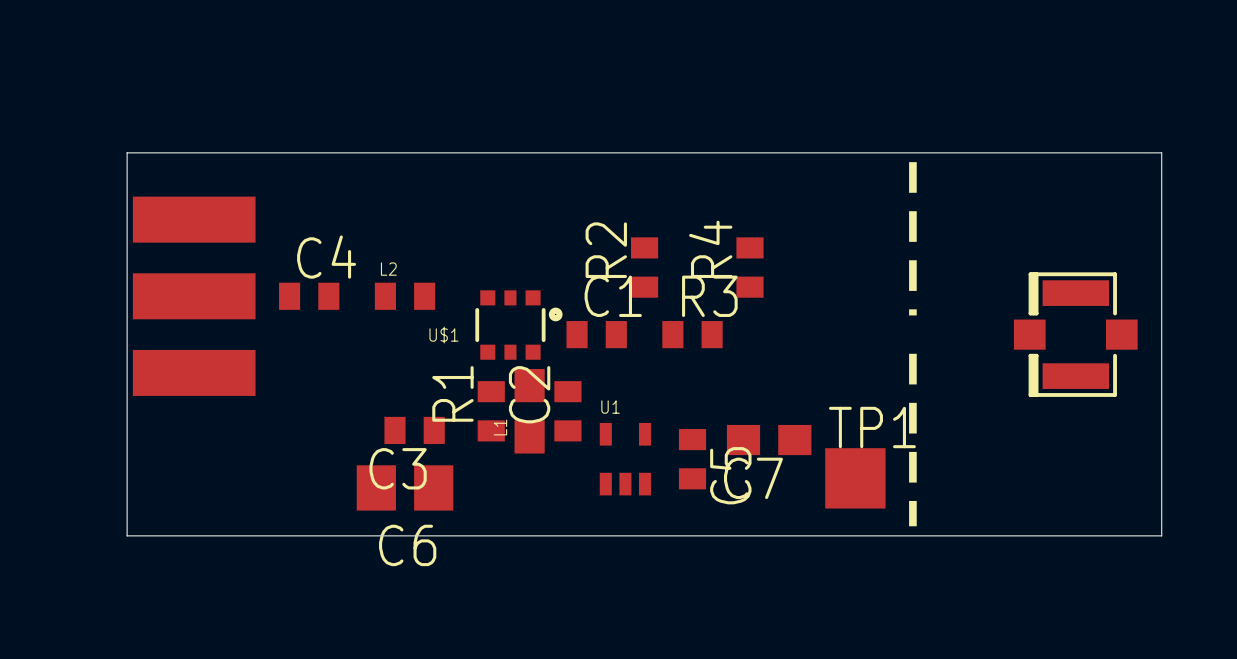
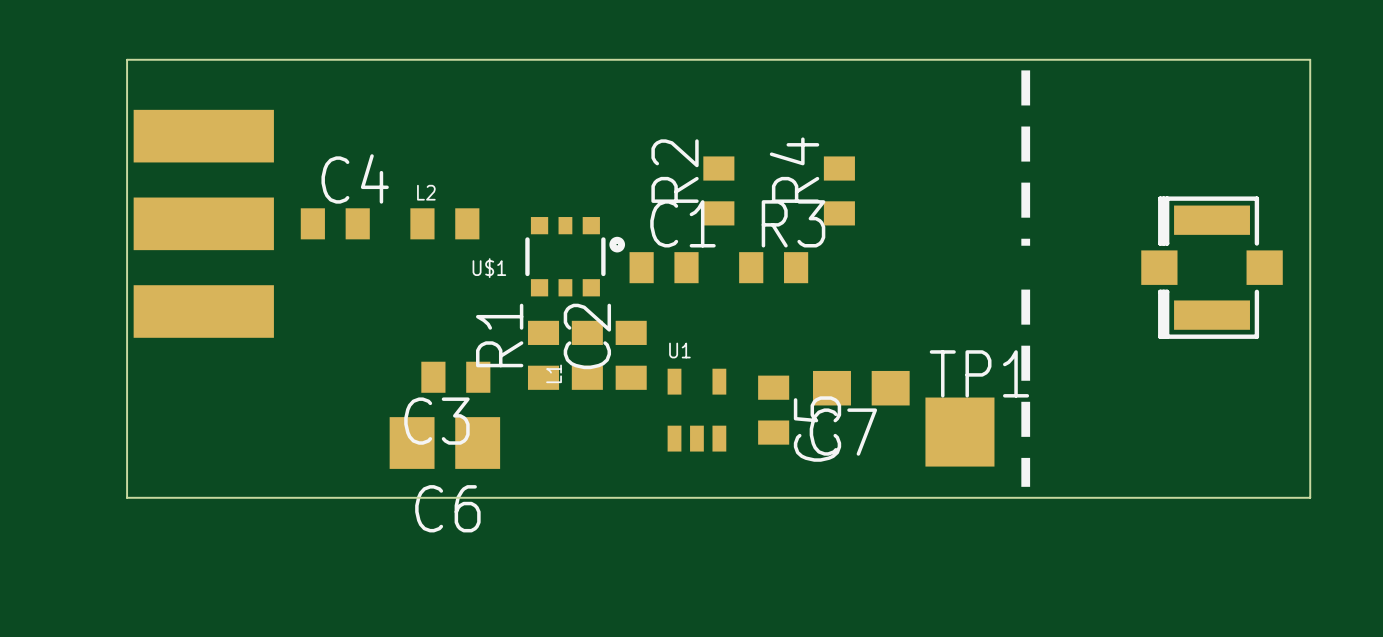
L1 footprint: [514, 369, 545, 454] -> [571, 320, 603, 390]

